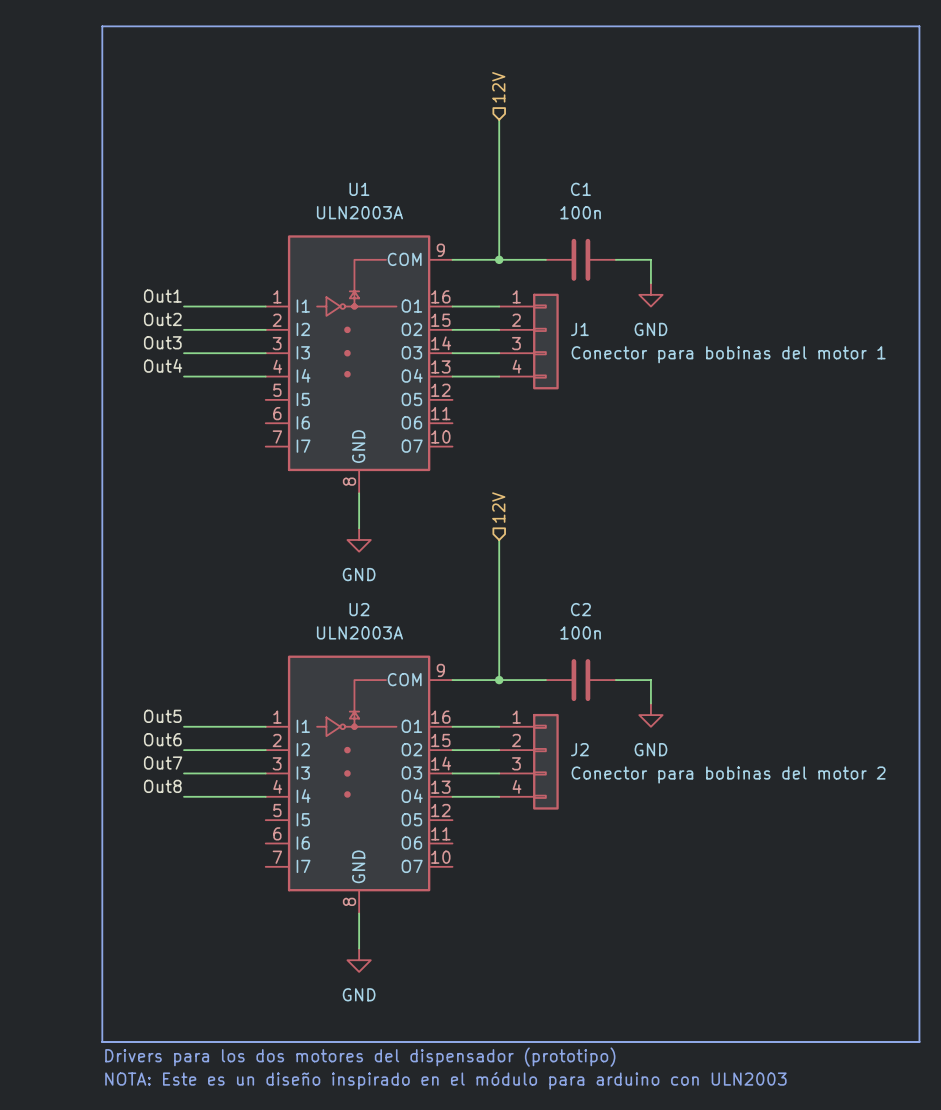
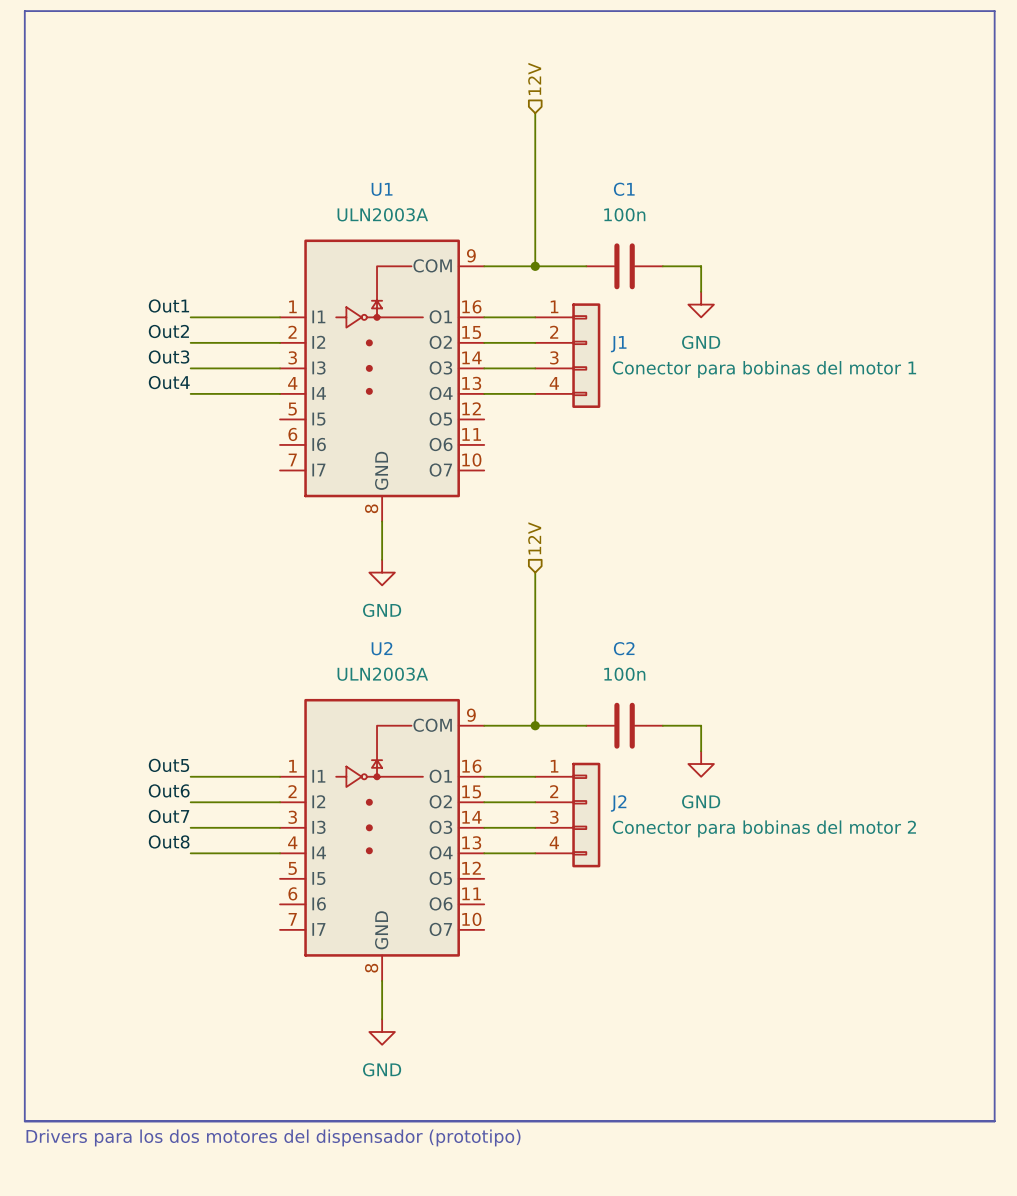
line: (102, 26) (102, 1041) -> (101, 11) (24, 11) (24, 1121) (101, 1121)
text position: Drivers para los dos motores del dispensador (prototipo) (360, 1057) -> Drivers para los dos motores del dispensador (prototipo) (273, 1137)
text: NOTA: Este es un diseño inspirado en el módulo para arduino con ULN2003 (445, 1080) -> none

